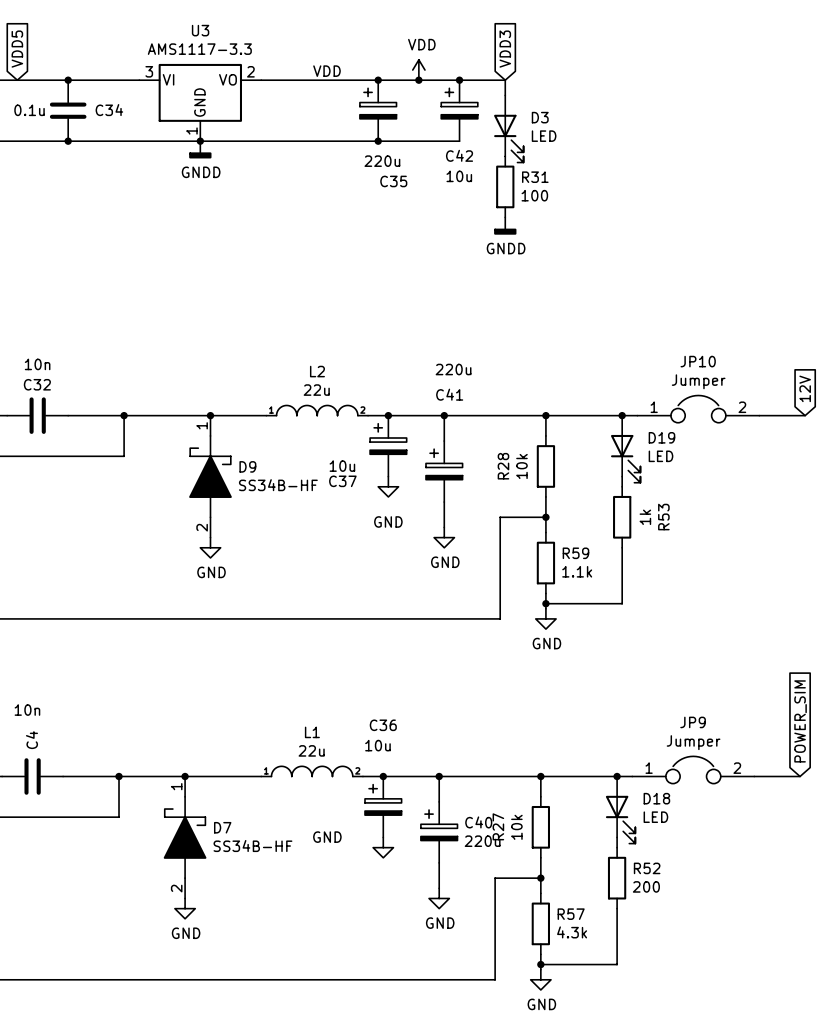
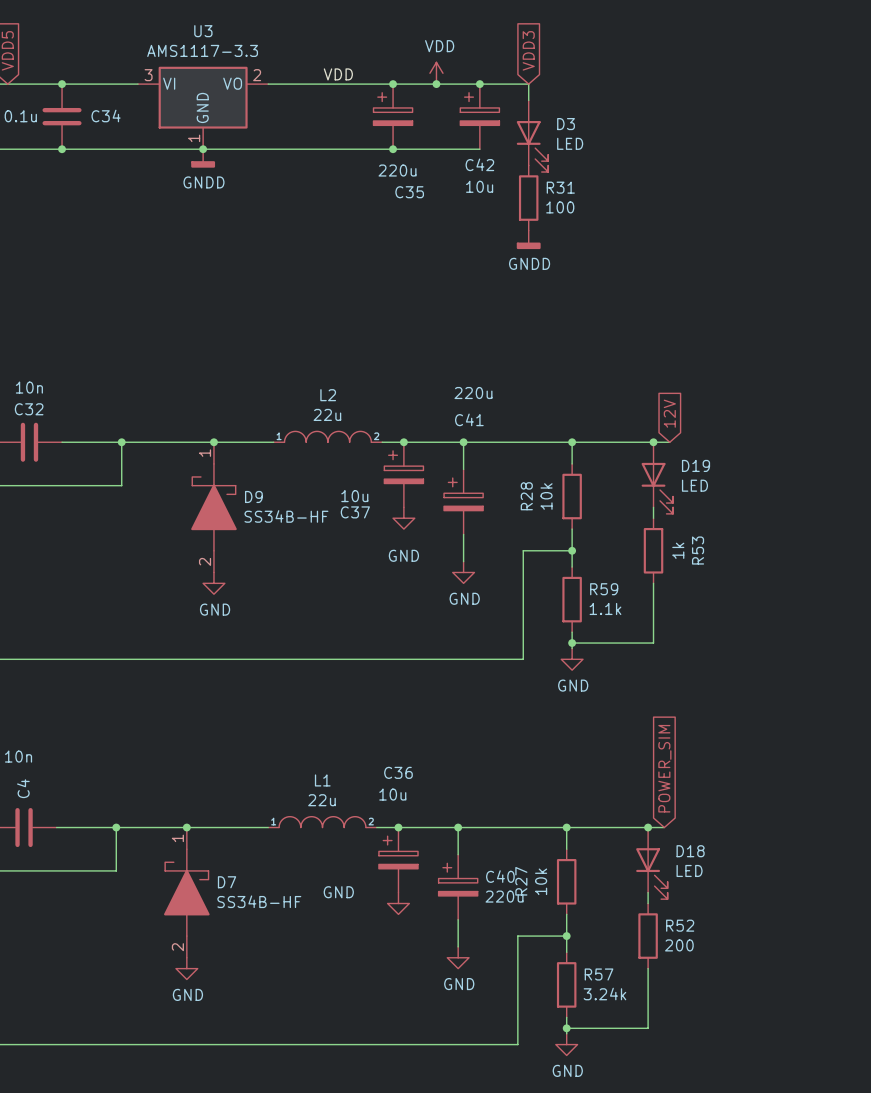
global label position: 12V (805, 388) -> 12V (669, 413)
JP10: Jumper (698, 409) -> none
wire: (759, 415) (805, 415) -> none
global label position: POWER_SIM (800, 721) -> POWER_SIM (664, 768)
JP9: Jumper (693, 769) -> none
wire: (754, 776) (800, 776) -> none
R57 value: 4.3k (572, 932) -> 3.24k (604, 994)

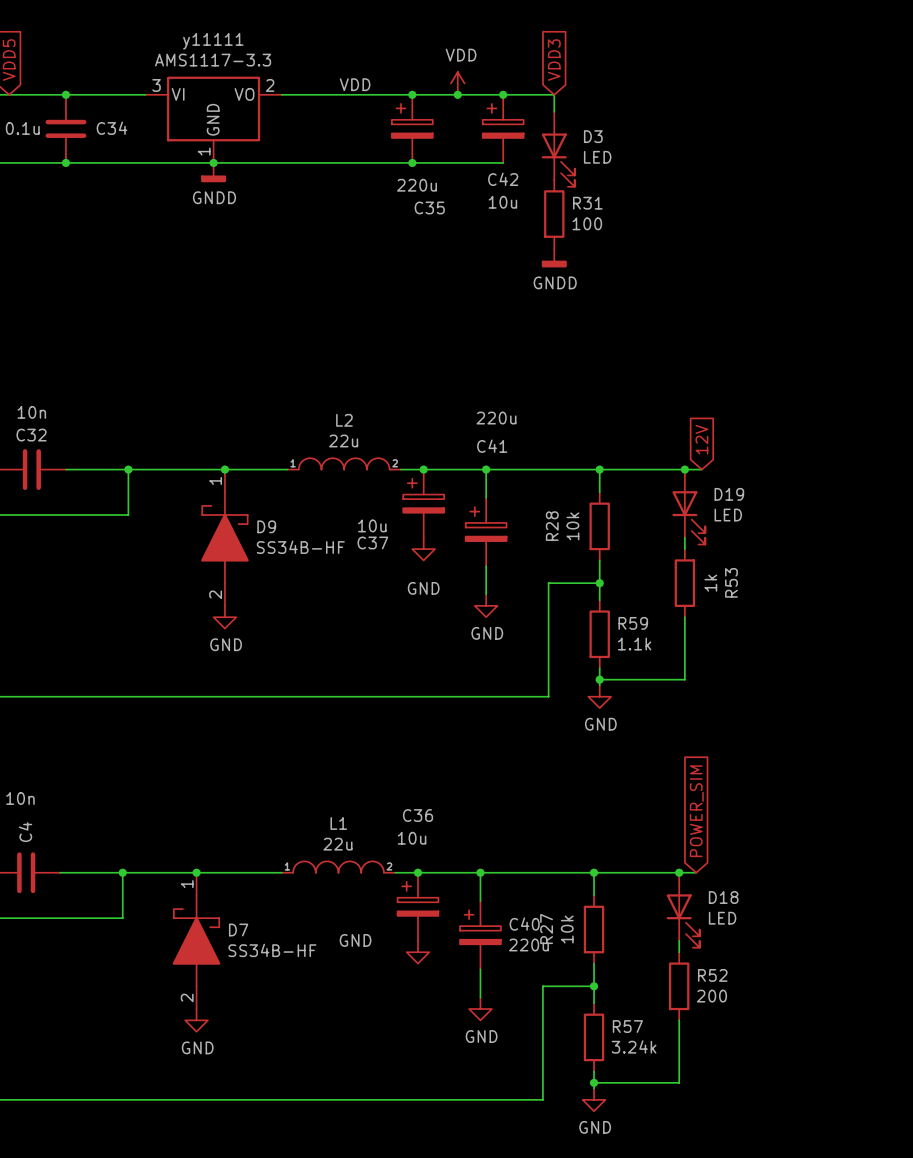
U3 name: U3 (203, 31) -> у11111 (213, 41)

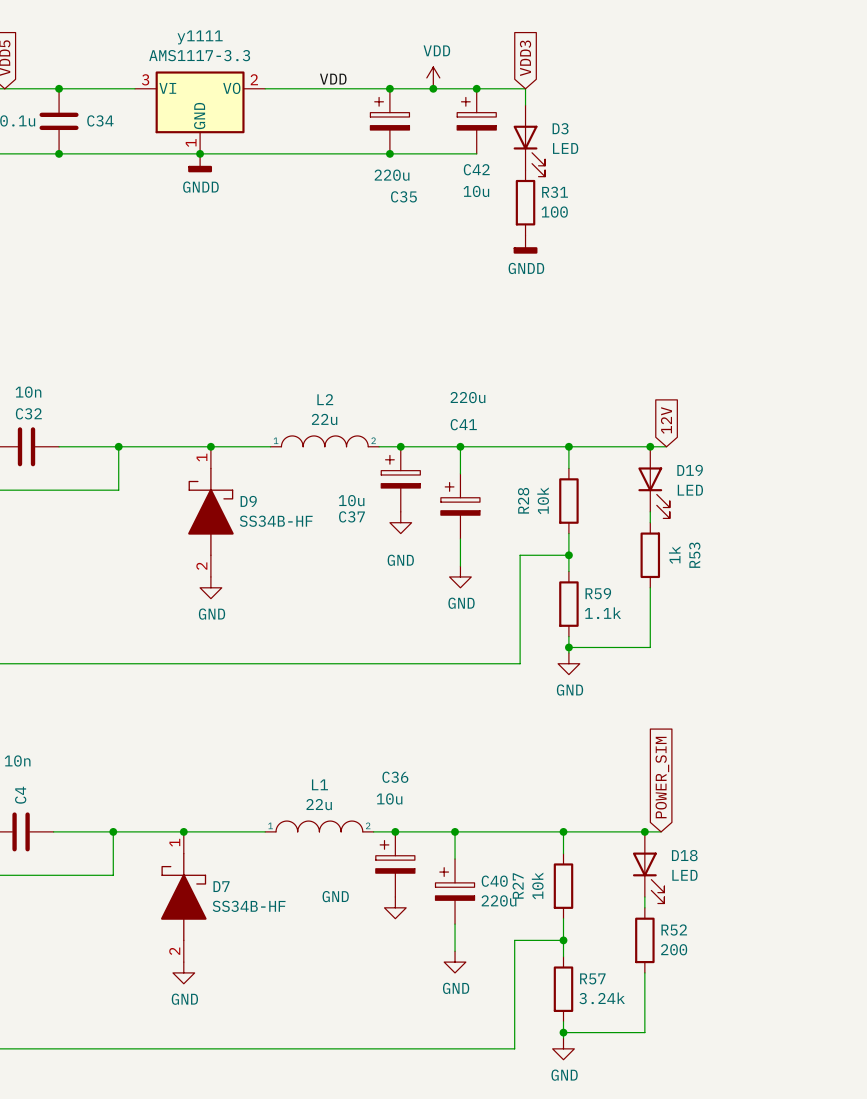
у11111 name: у11111 (213, 41) -> у1111 (200, 37)

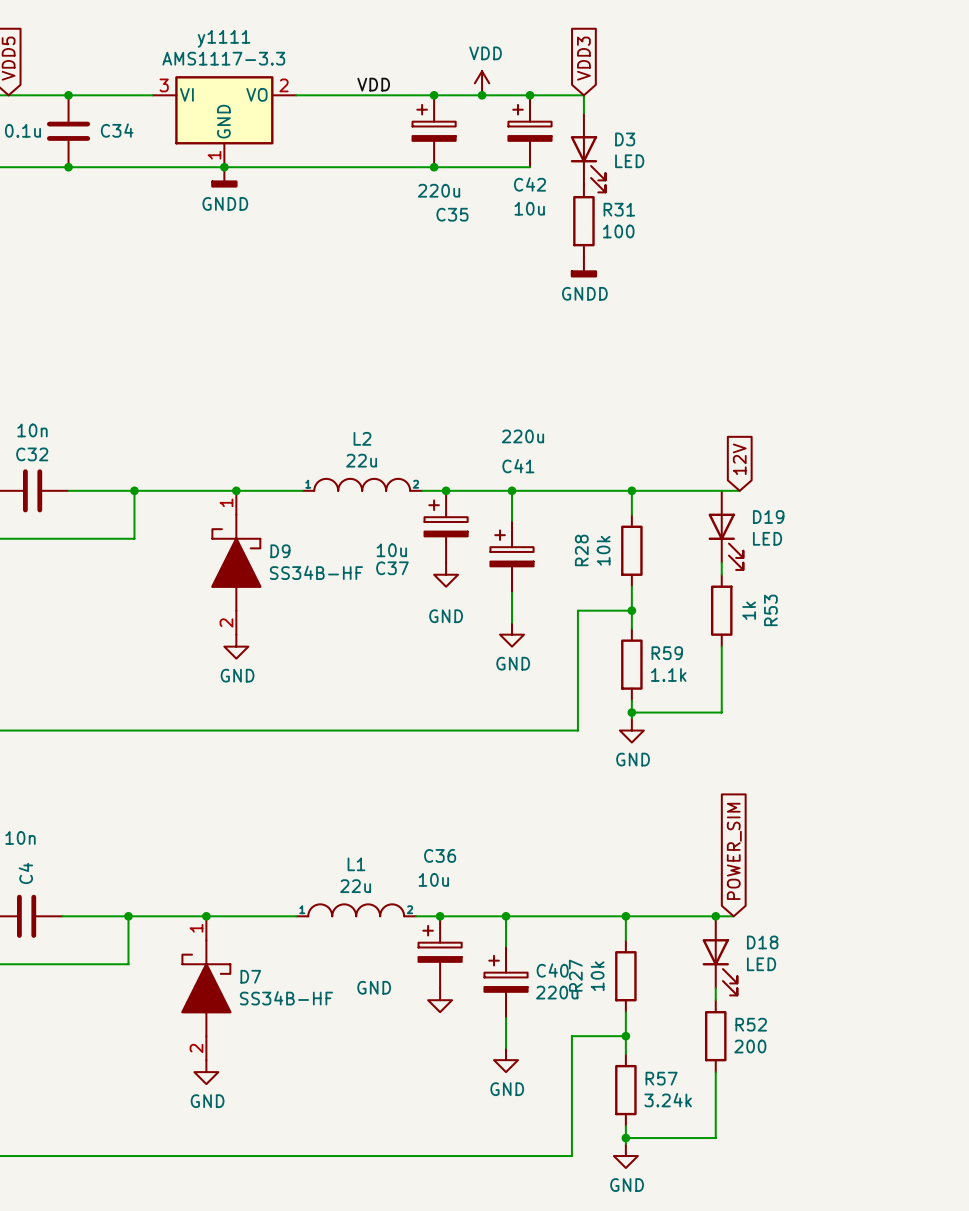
junction: (650, 446) -> none

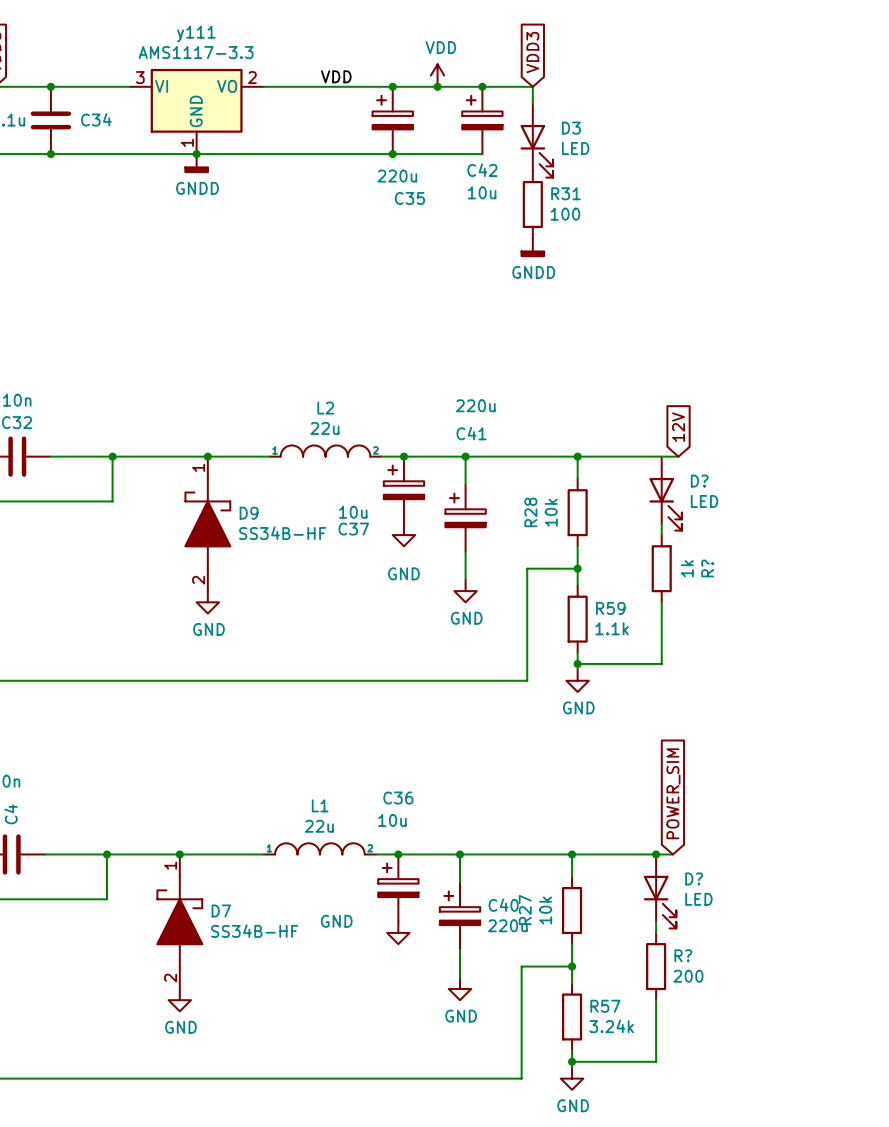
у1111 name: у1111 (224, 38) -> у111 (196, 34)
D19 name: D19 (768, 516) -> D? (699, 481)
R53 name: R53 (770, 610) -> R? (707, 568)
D18 name: D18 (762, 942) -> D? (694, 878)
R52 name: R52 (751, 1024) -> R? (683, 955)

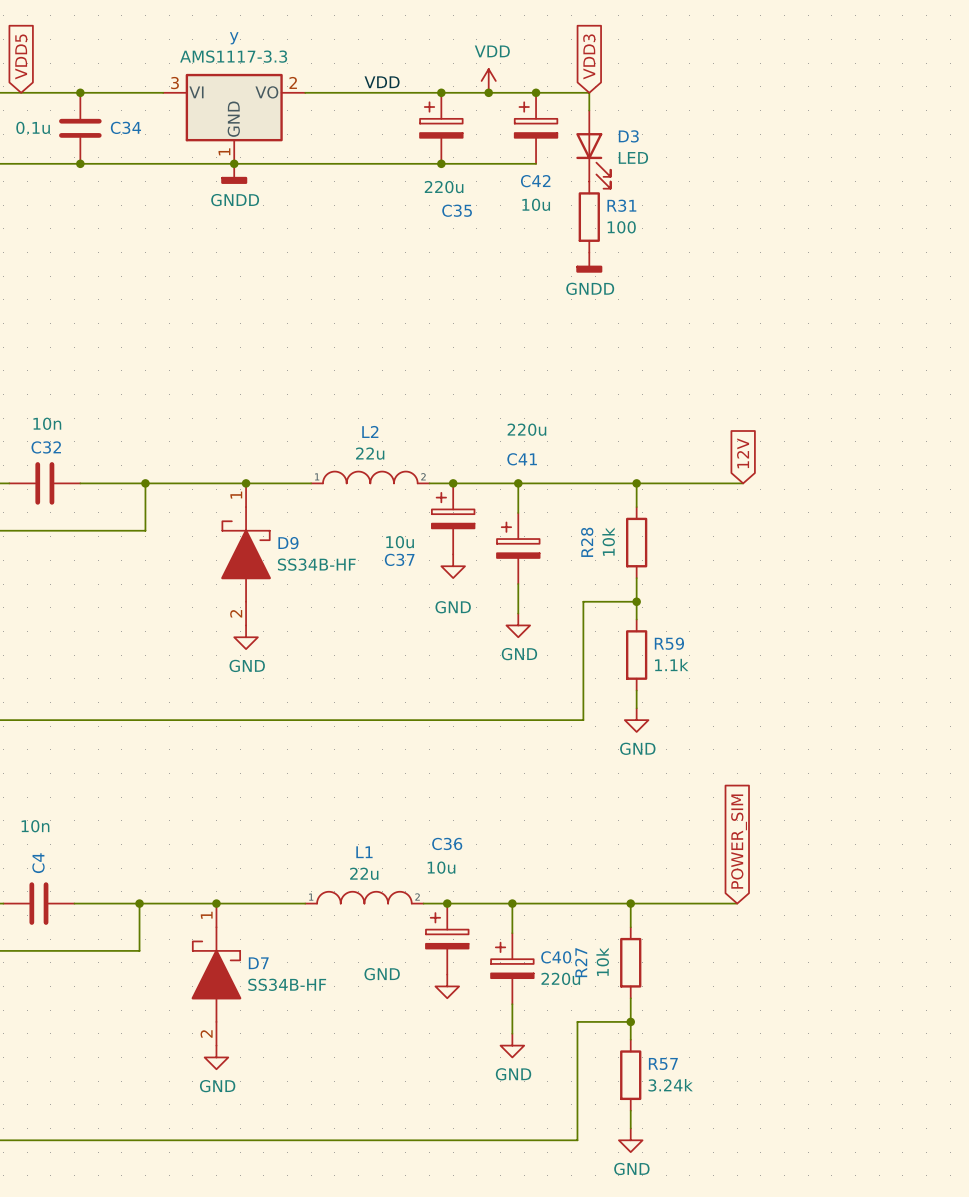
у111 name: у111 (196, 34) -> у (234, 38)
D?: LED (665, 493) -> none
wire: (661, 523) (661, 535) -> none
R?: 1k (661, 568) -> none
wire: (661, 602) (661, 663) (577, 663) -> none
junction: (577, 663) -> none
junction: (656, 854) -> none
D?: LED (660, 891) -> none
wire: (656, 921) (656, 932) -> none
R?: 200 (656, 966) -> none
wire: (656, 1000) (656, 1061) (572, 1061) -> none
junction: (572, 1061) -> none

